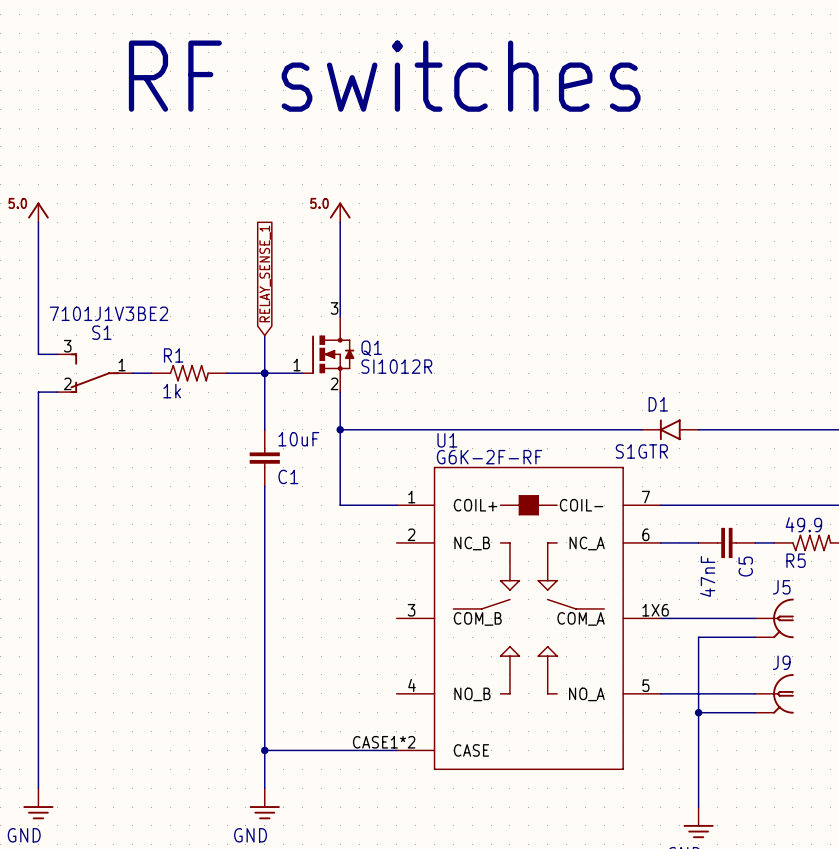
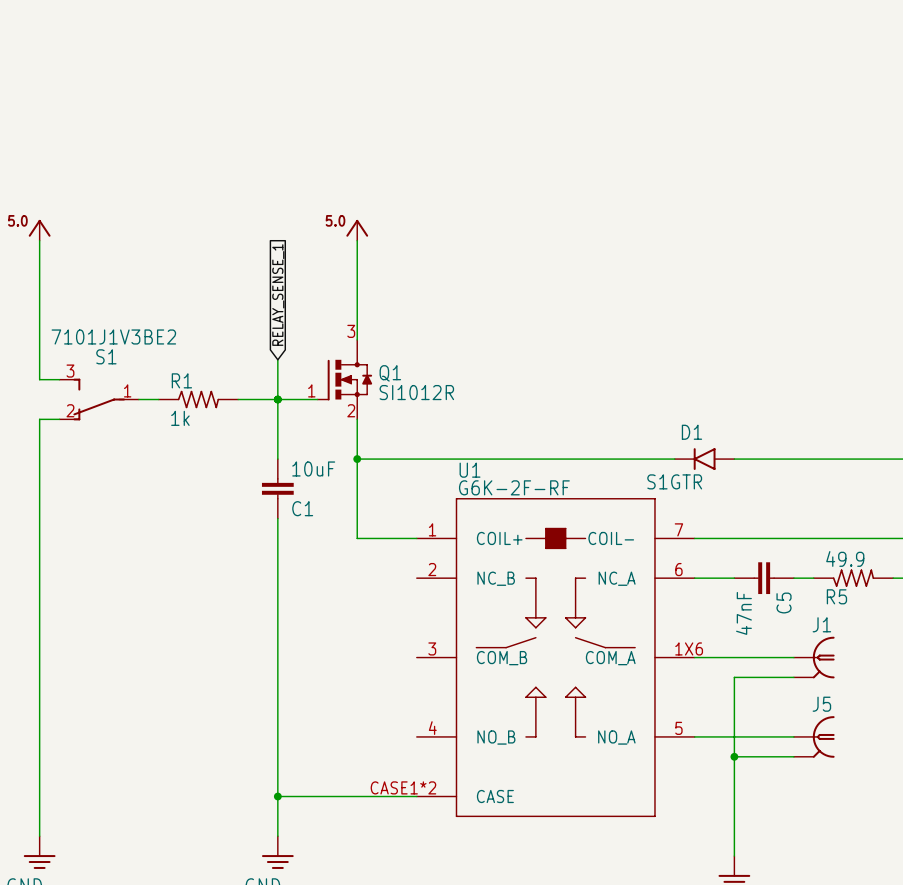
text: RF switches (384, 76) -> none
J5 name: J5 (781, 587) -> J1 (821, 624)
J9 name: J9 (781, 662) -> J5 (821, 704)

